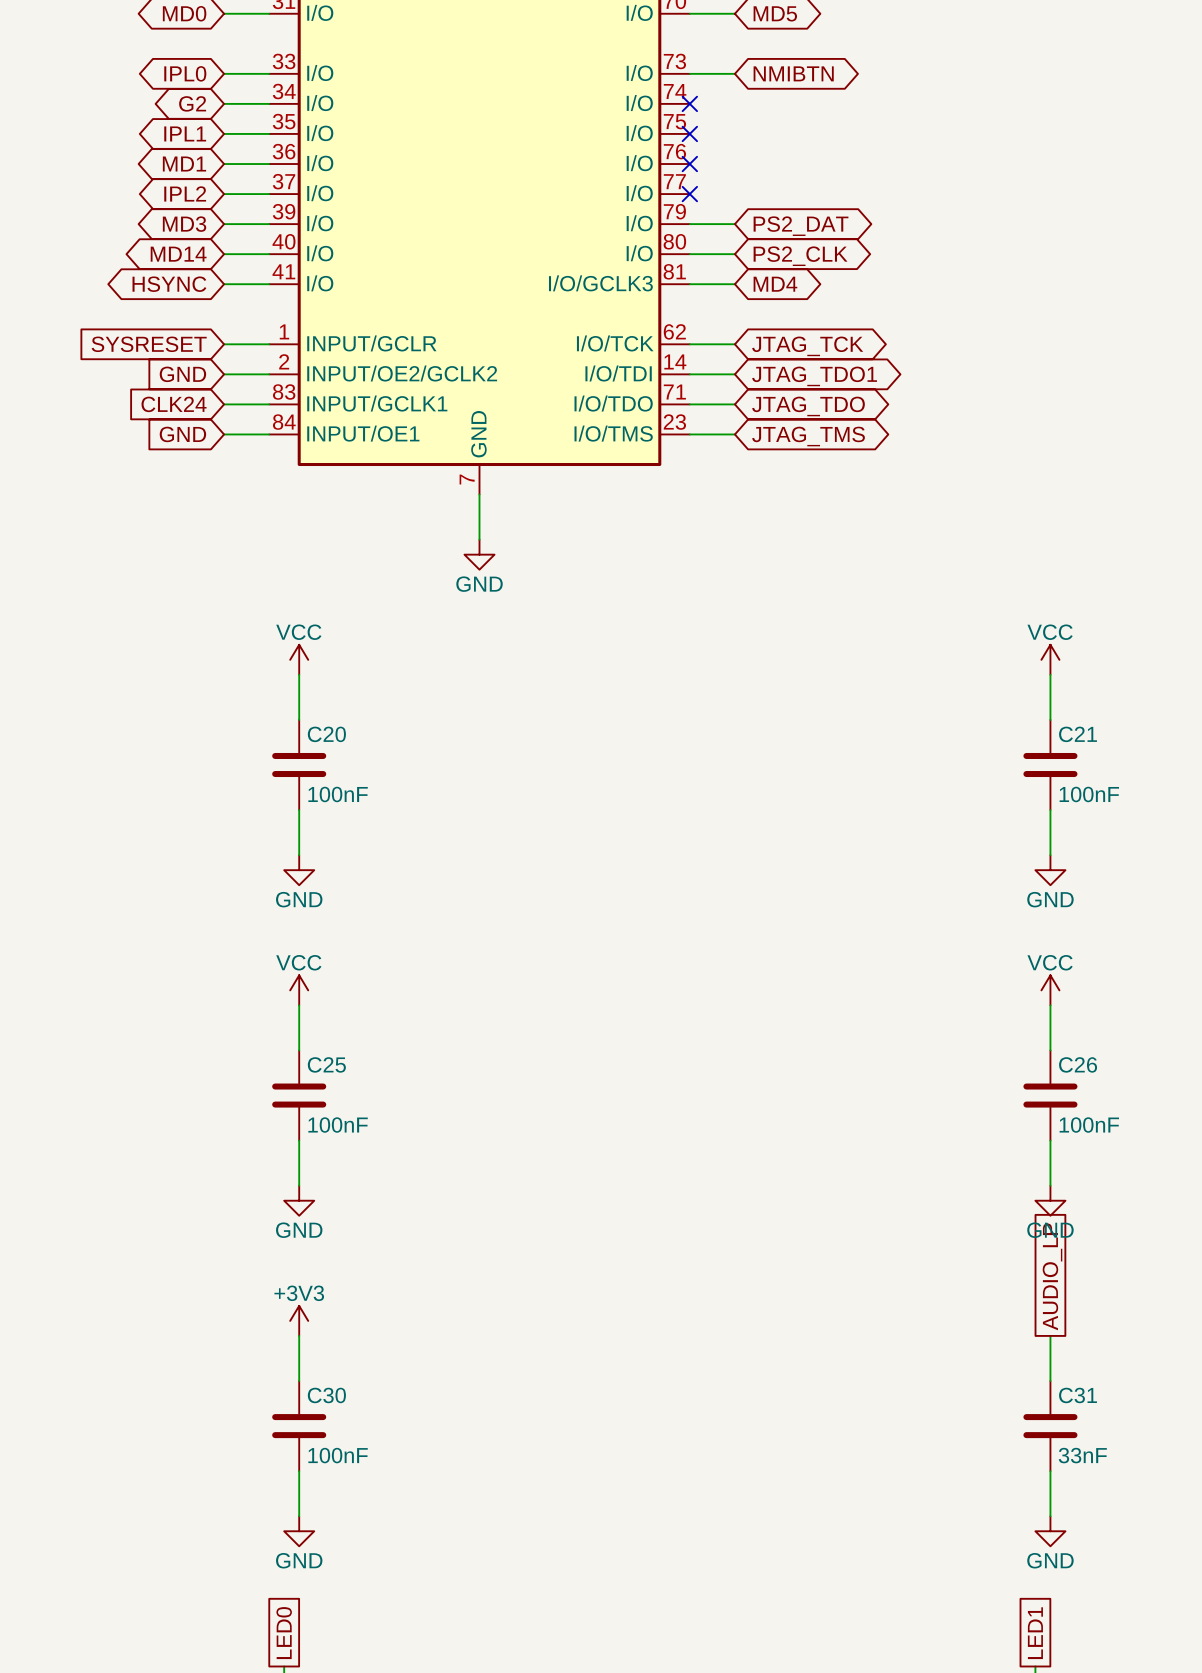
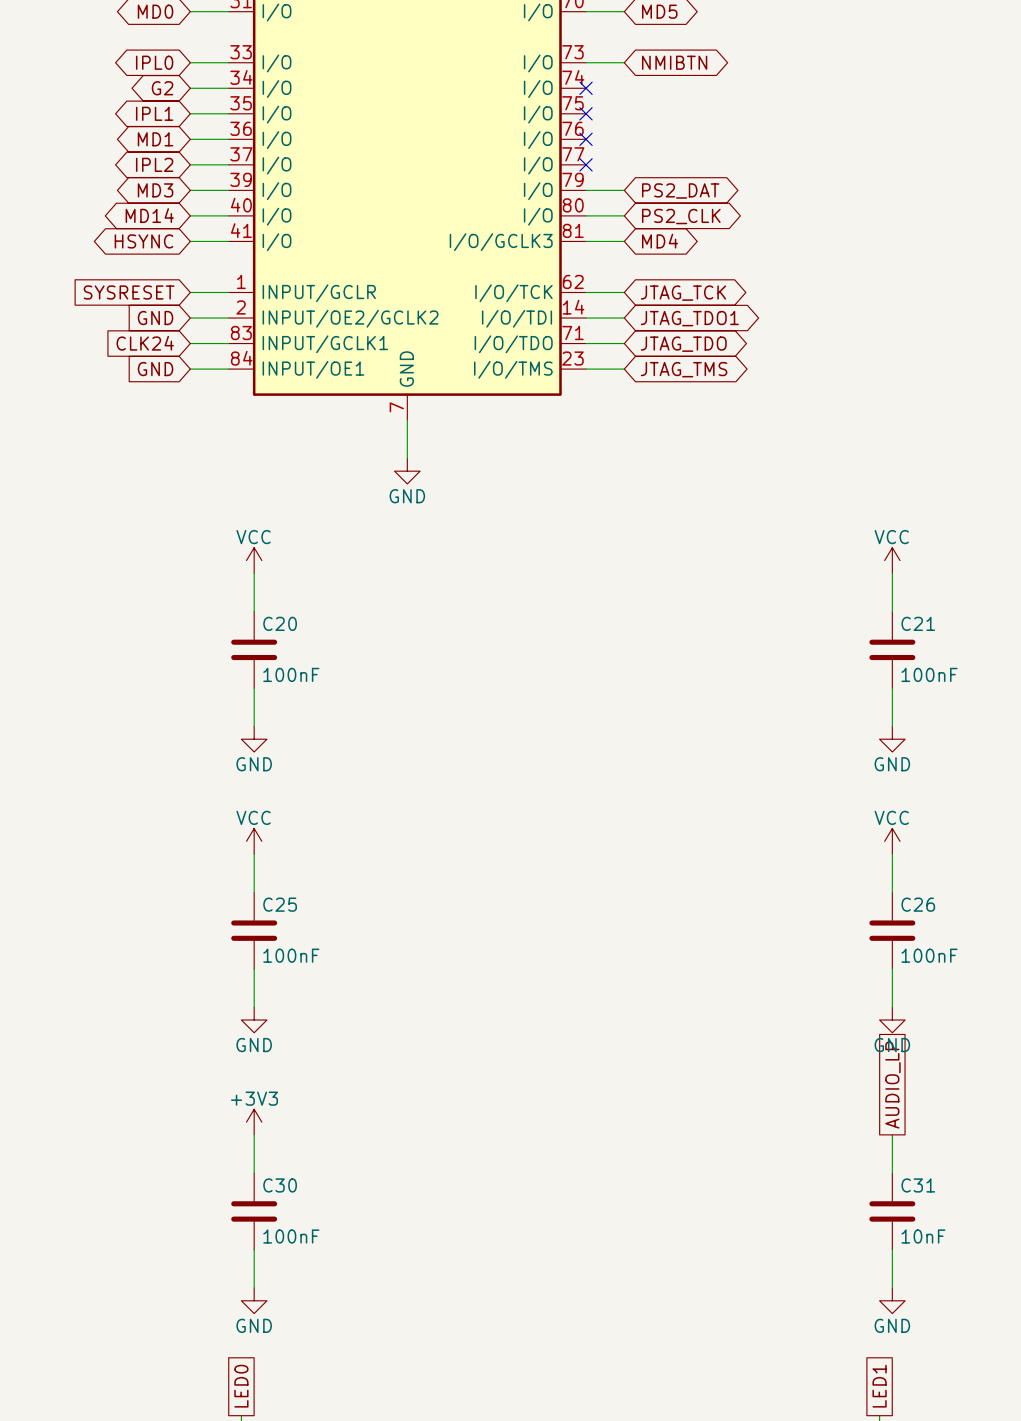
C31 value: 33nF (1082, 1455) -> 10nF (923, 1236)

